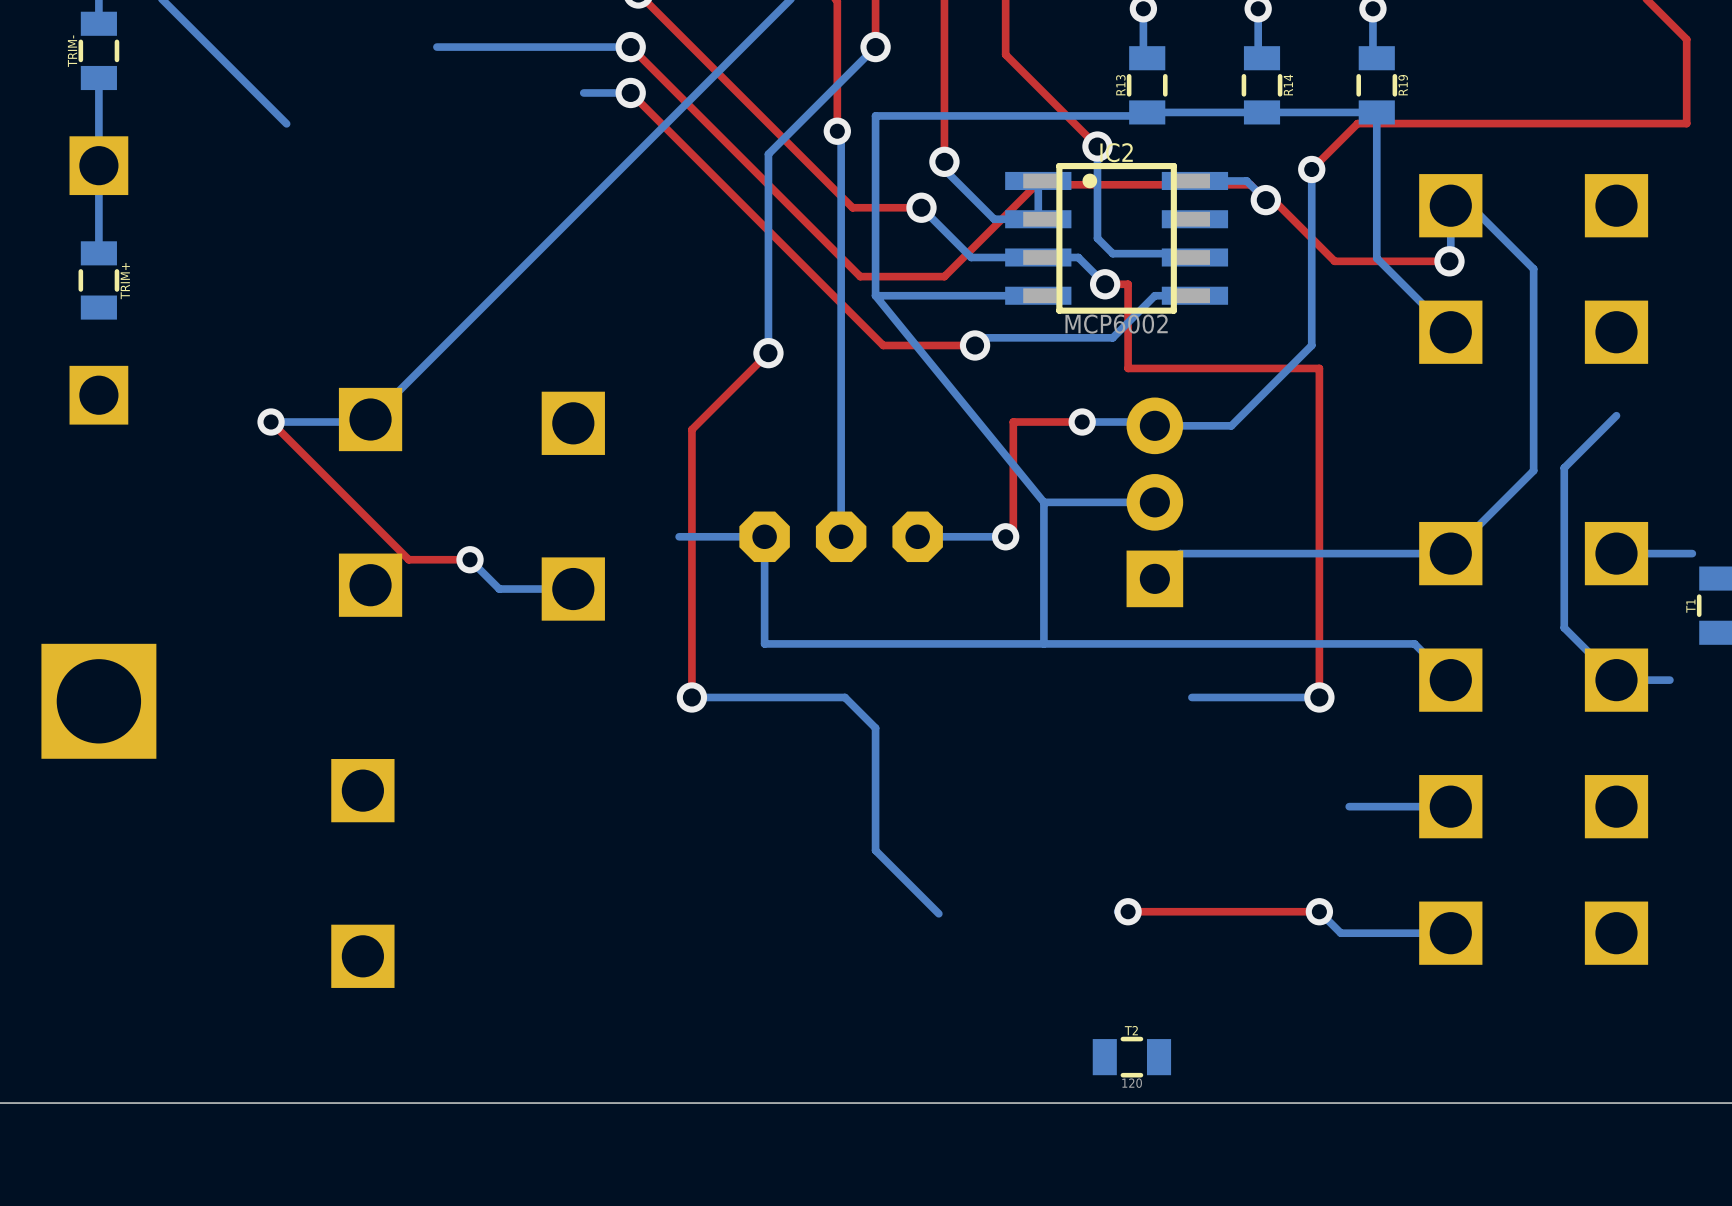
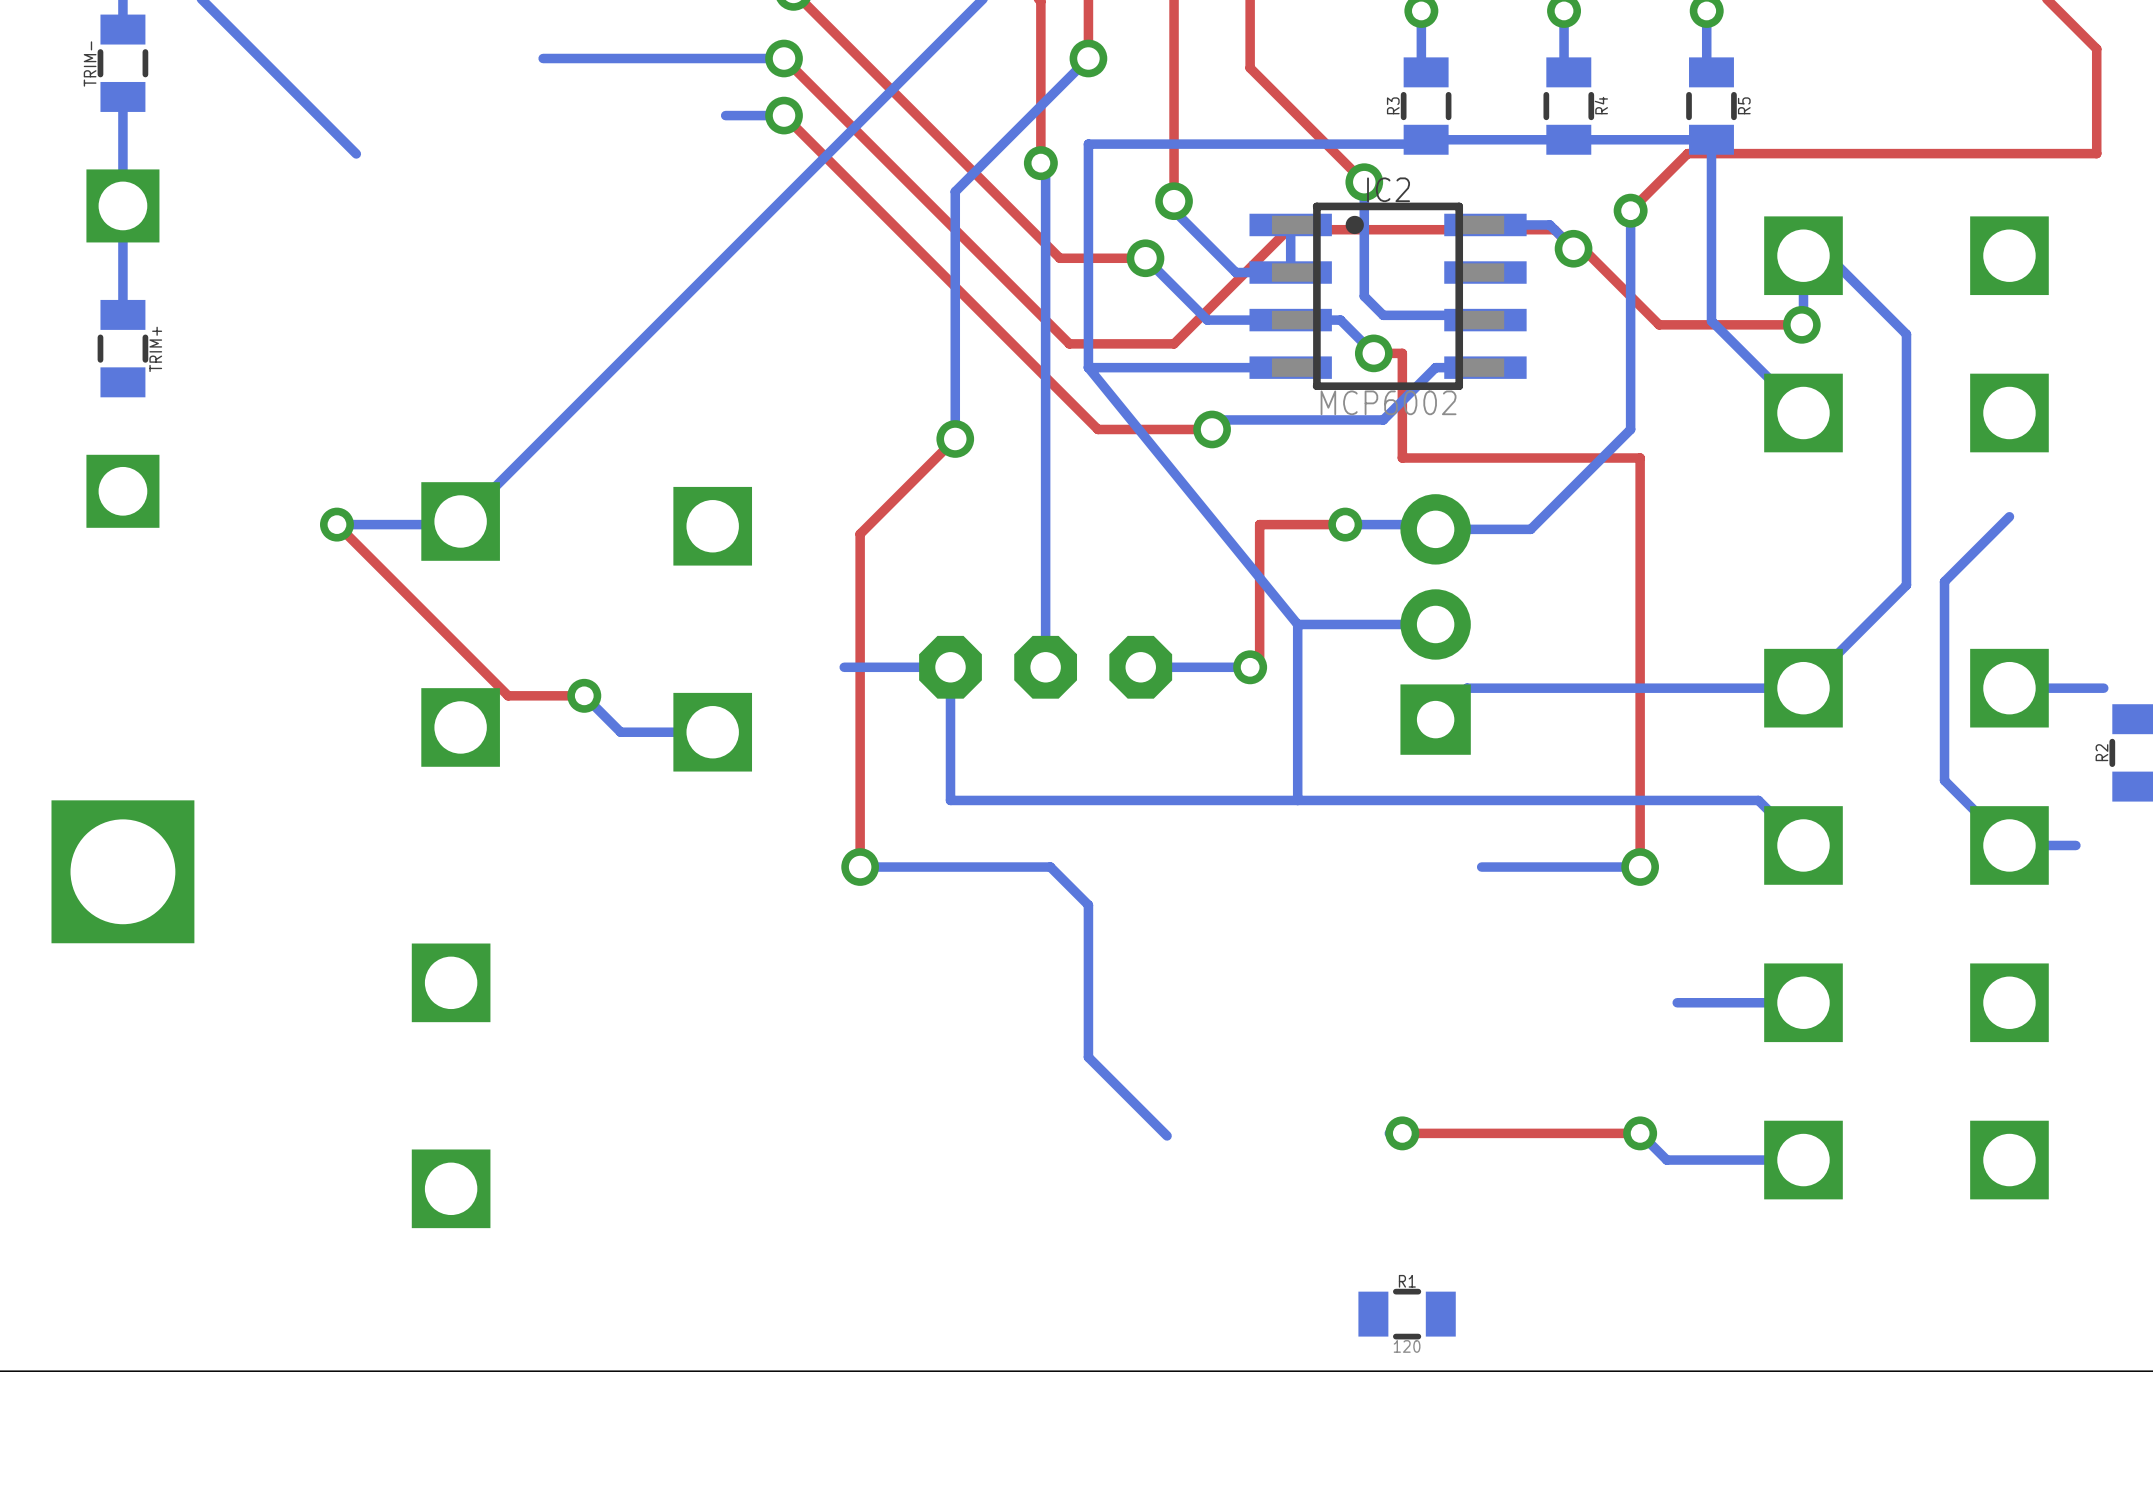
R13 name: R13 (1120, 85) -> R3 (1393, 105)
R14 name: R14 (1288, 85) -> R4 (1601, 105)
R19 name: R19 (1403, 85) -> R5 (1744, 105)
T1 name: T1 (1690, 606) -> R2 (2101, 752)
T2 name: T2 (1131, 1030) -> R1 (1407, 1281)

